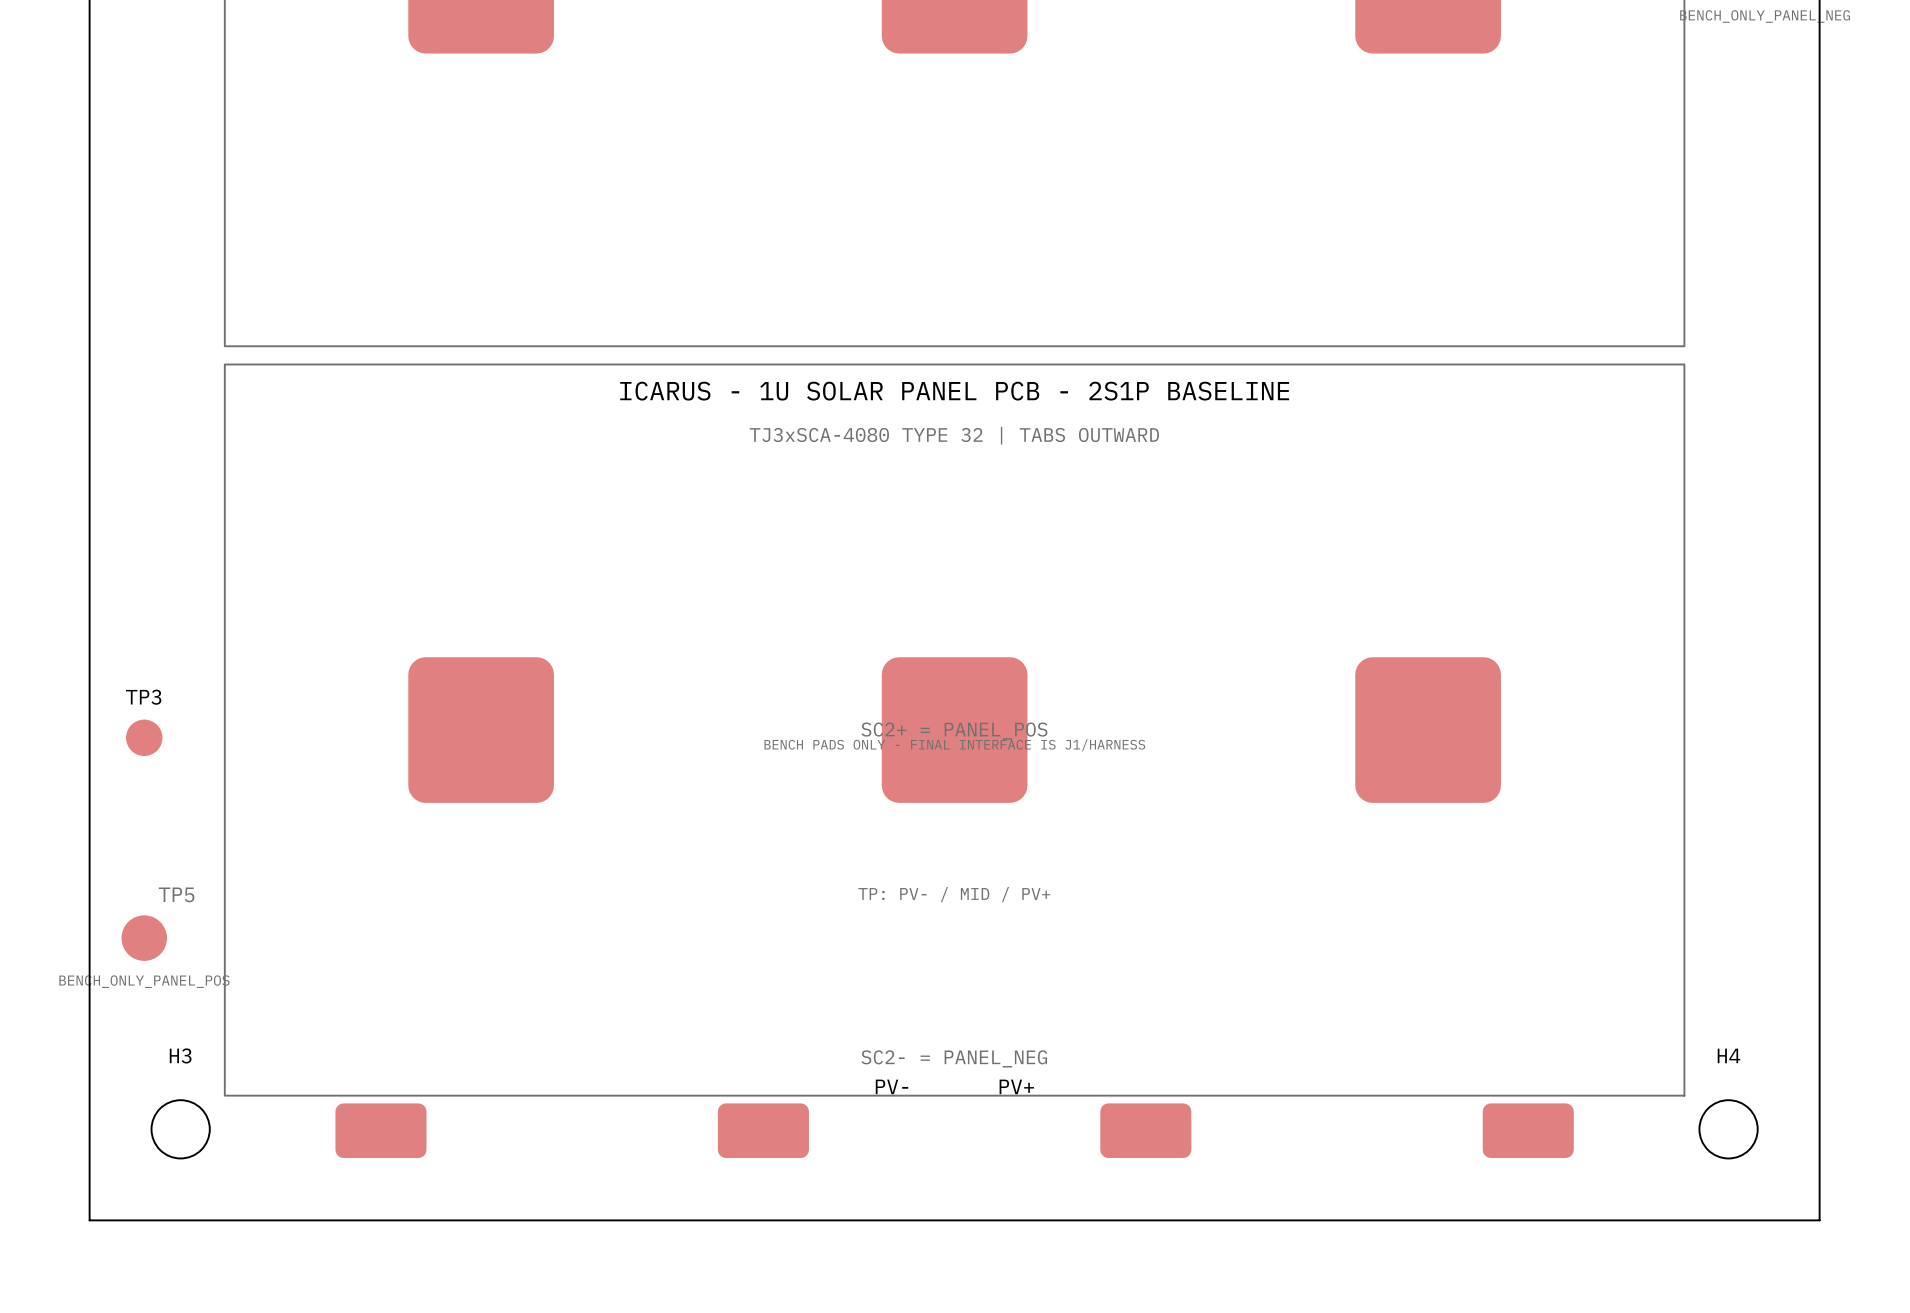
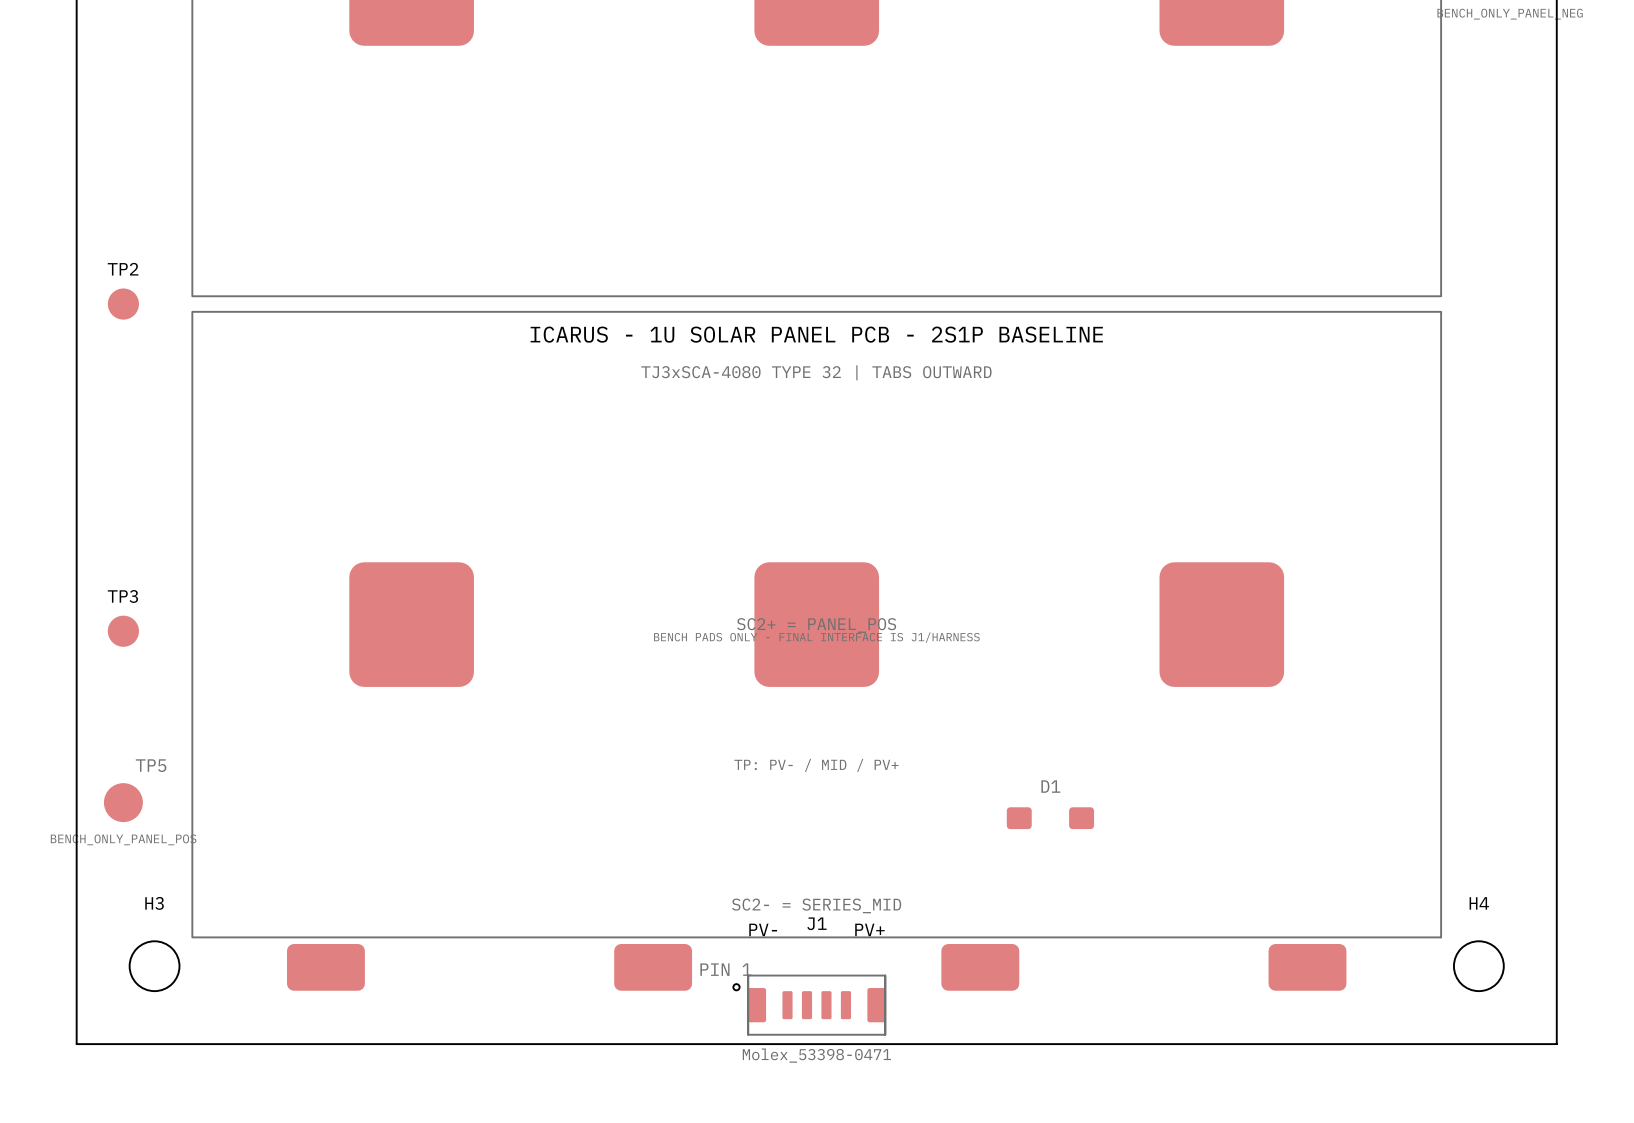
TP2: none -> (123, 304)
D1: none -> (1050, 818)
part text: SC2- = PANEL_NEG (954, 1058) -> SC2- = SERIES_MID (816, 905)
J1: none -> Molex_53398-0471 (809, 1005)

